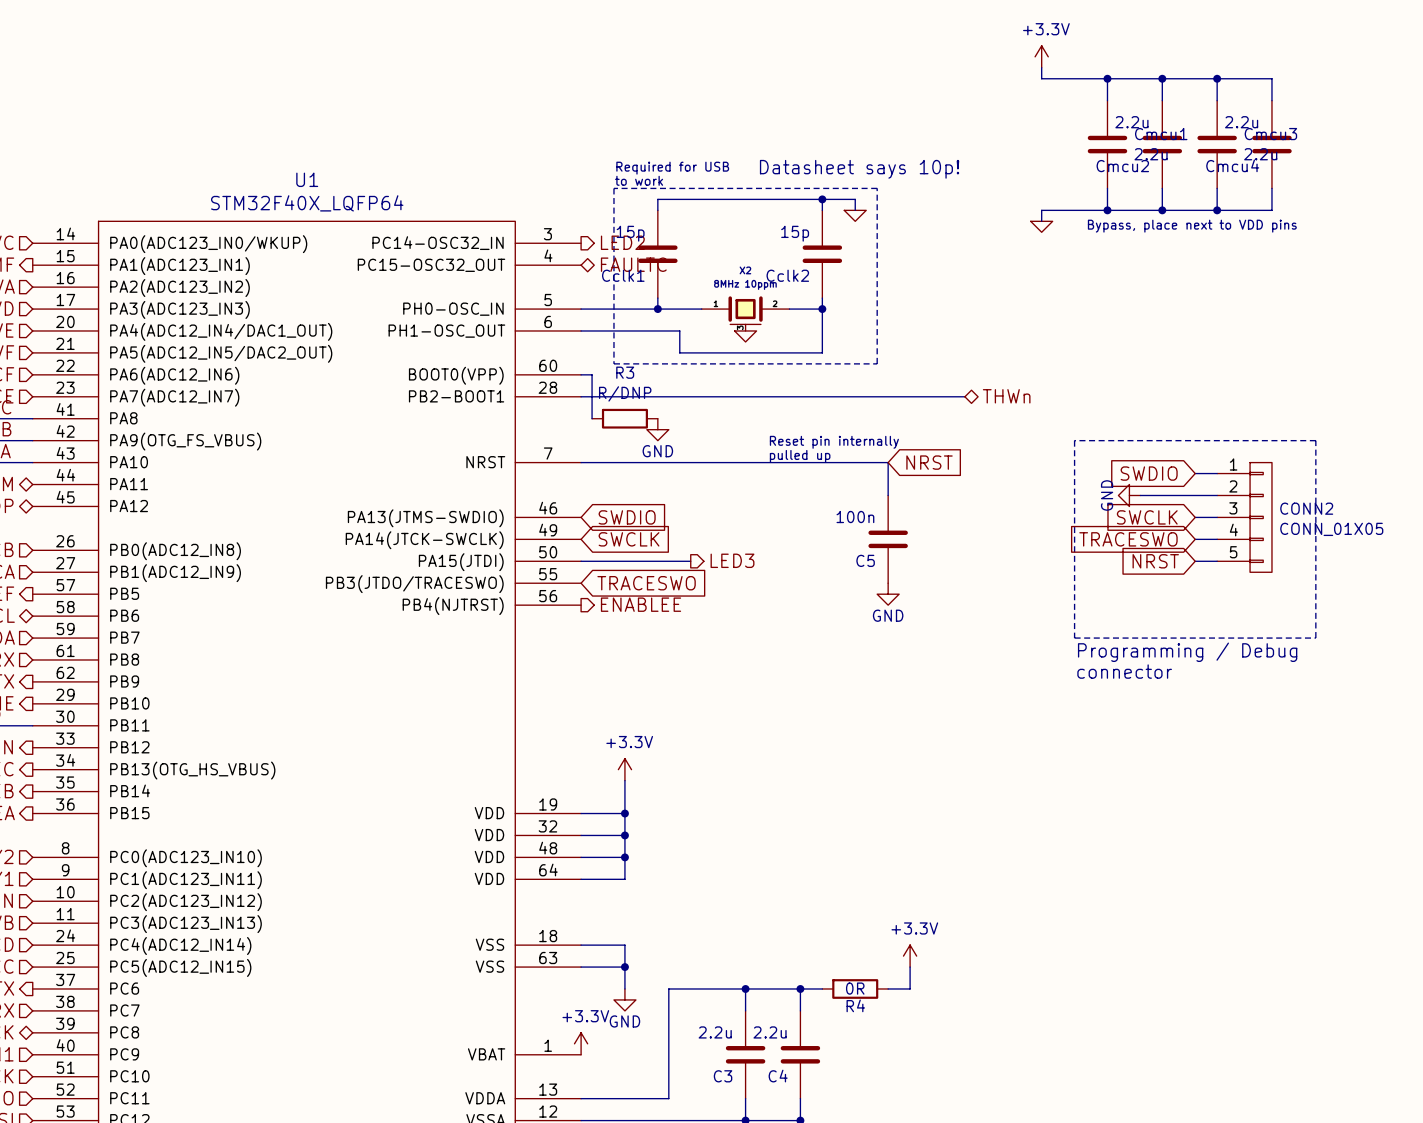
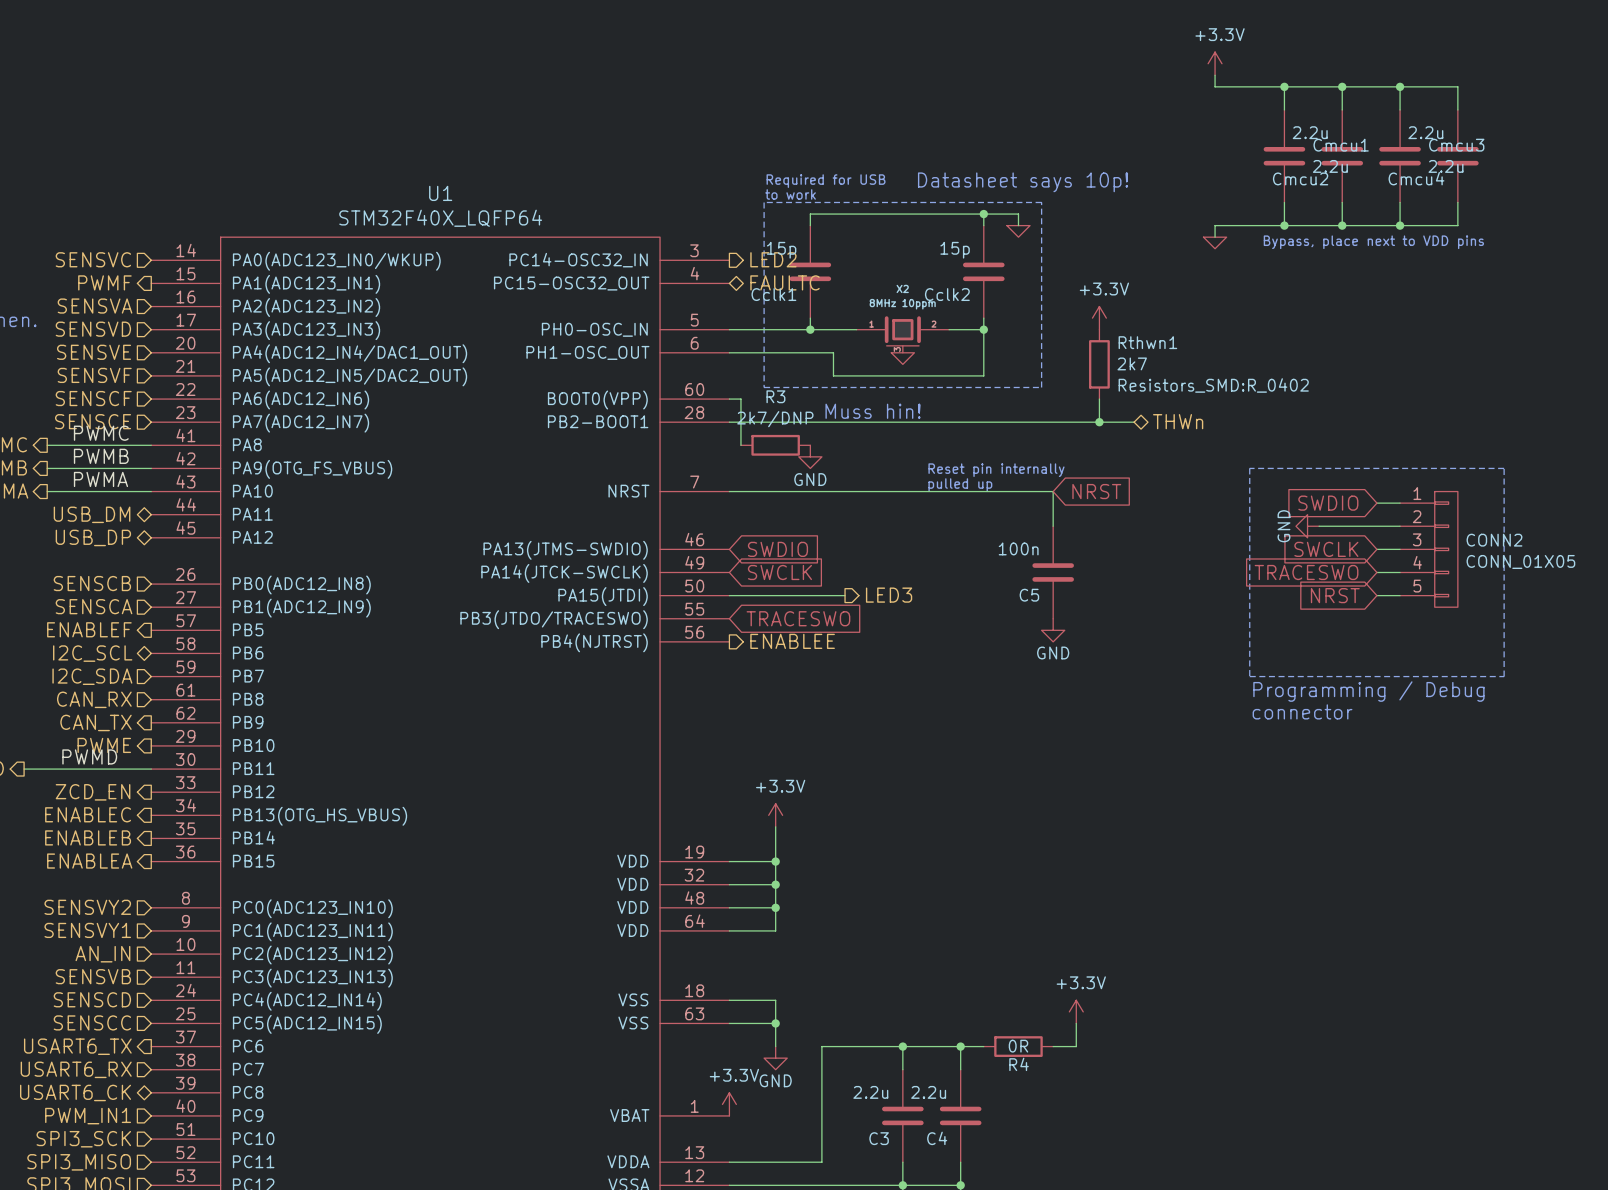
power symbol: none -> +3.3V (1099, 318)
Rthwn1: none -> 2k7 (1099, 364)
wire: none -> (1099, 399) (1099, 422)
text: none -> Muss hin! (873, 411)
R3 value: R/DNP (625, 393) -> 2k7/DNP (775, 419)
junction: none -> (1099, 422)

